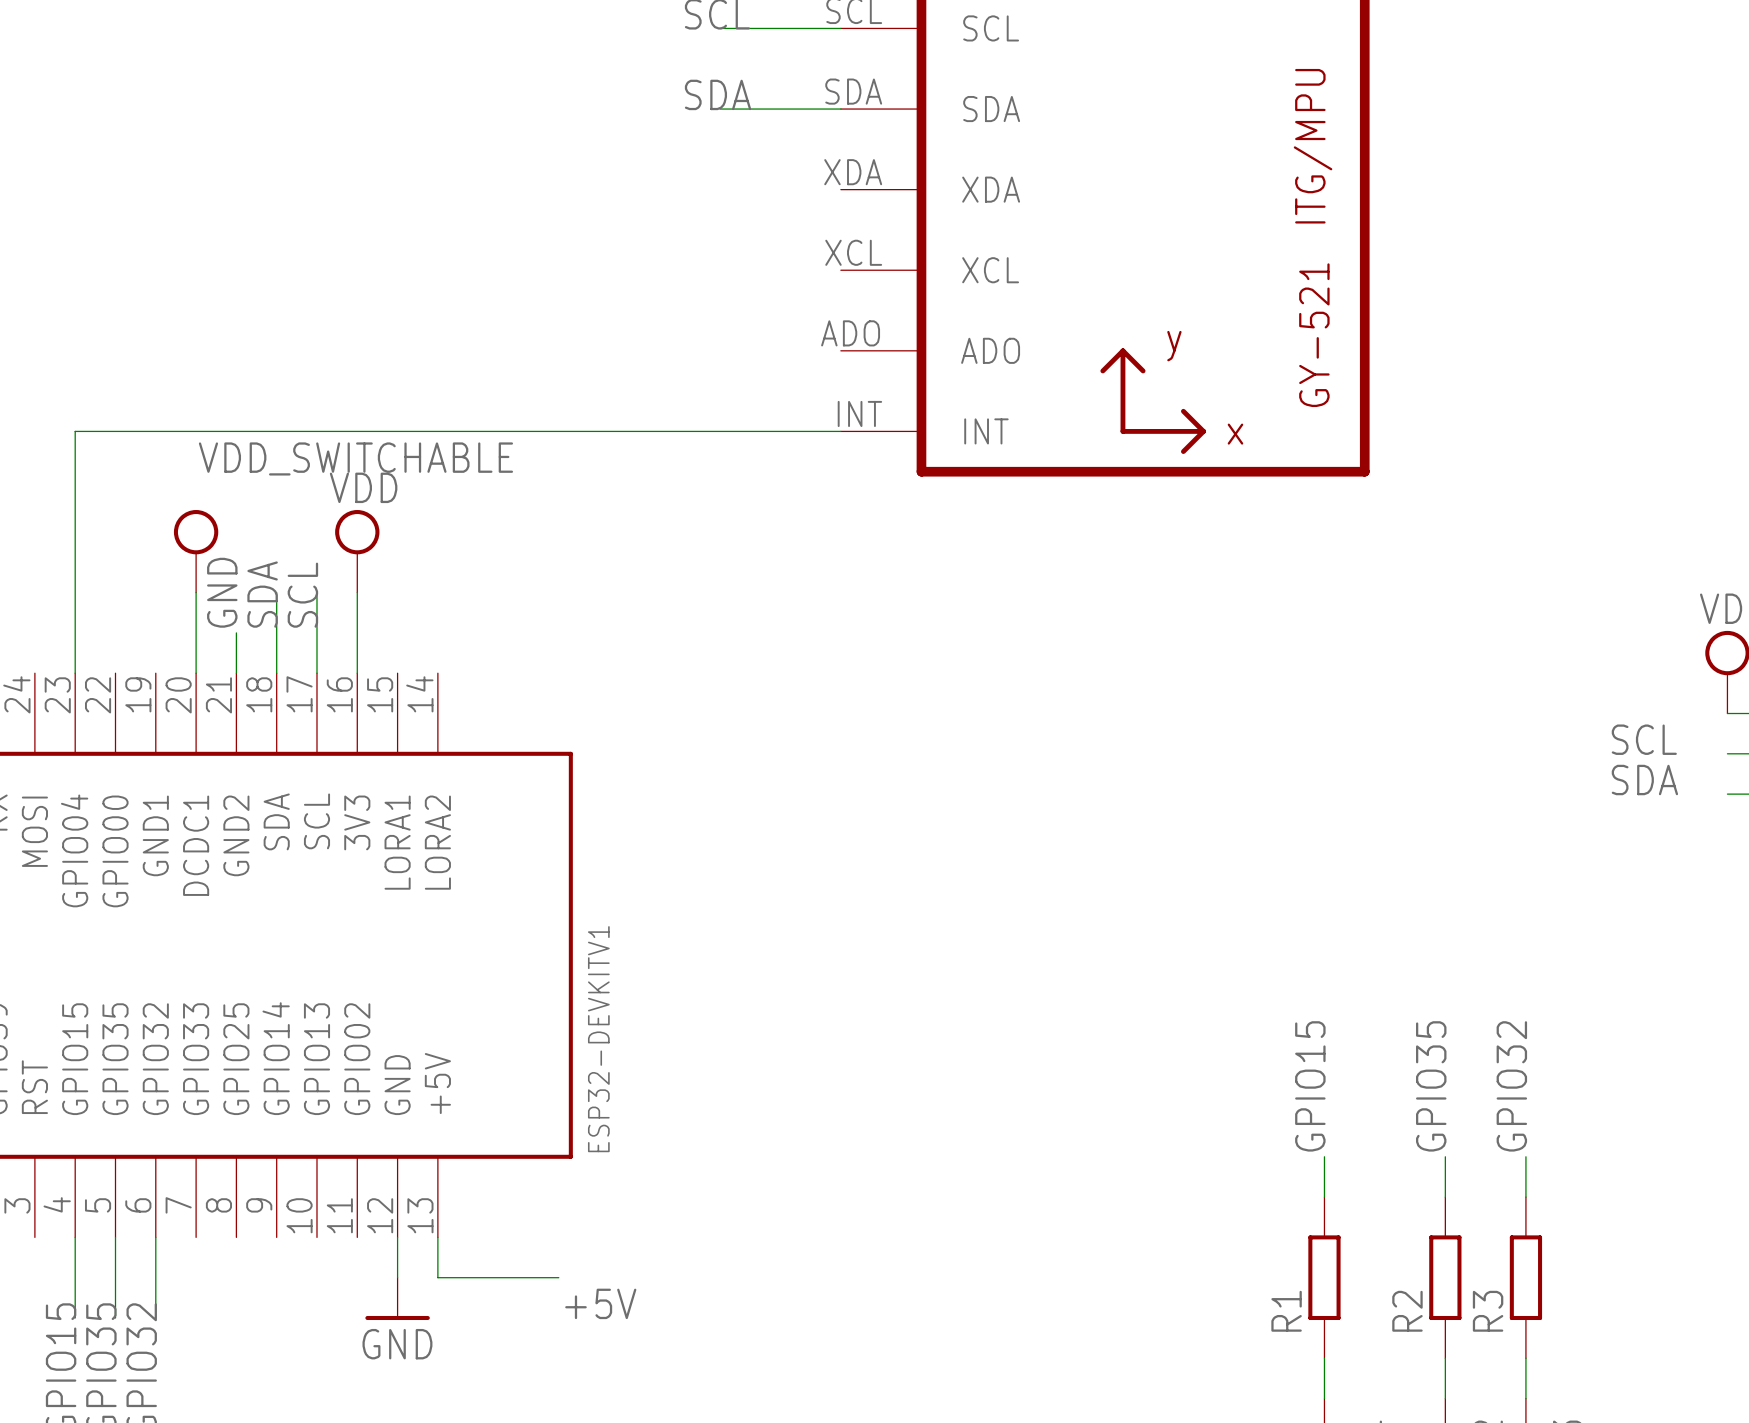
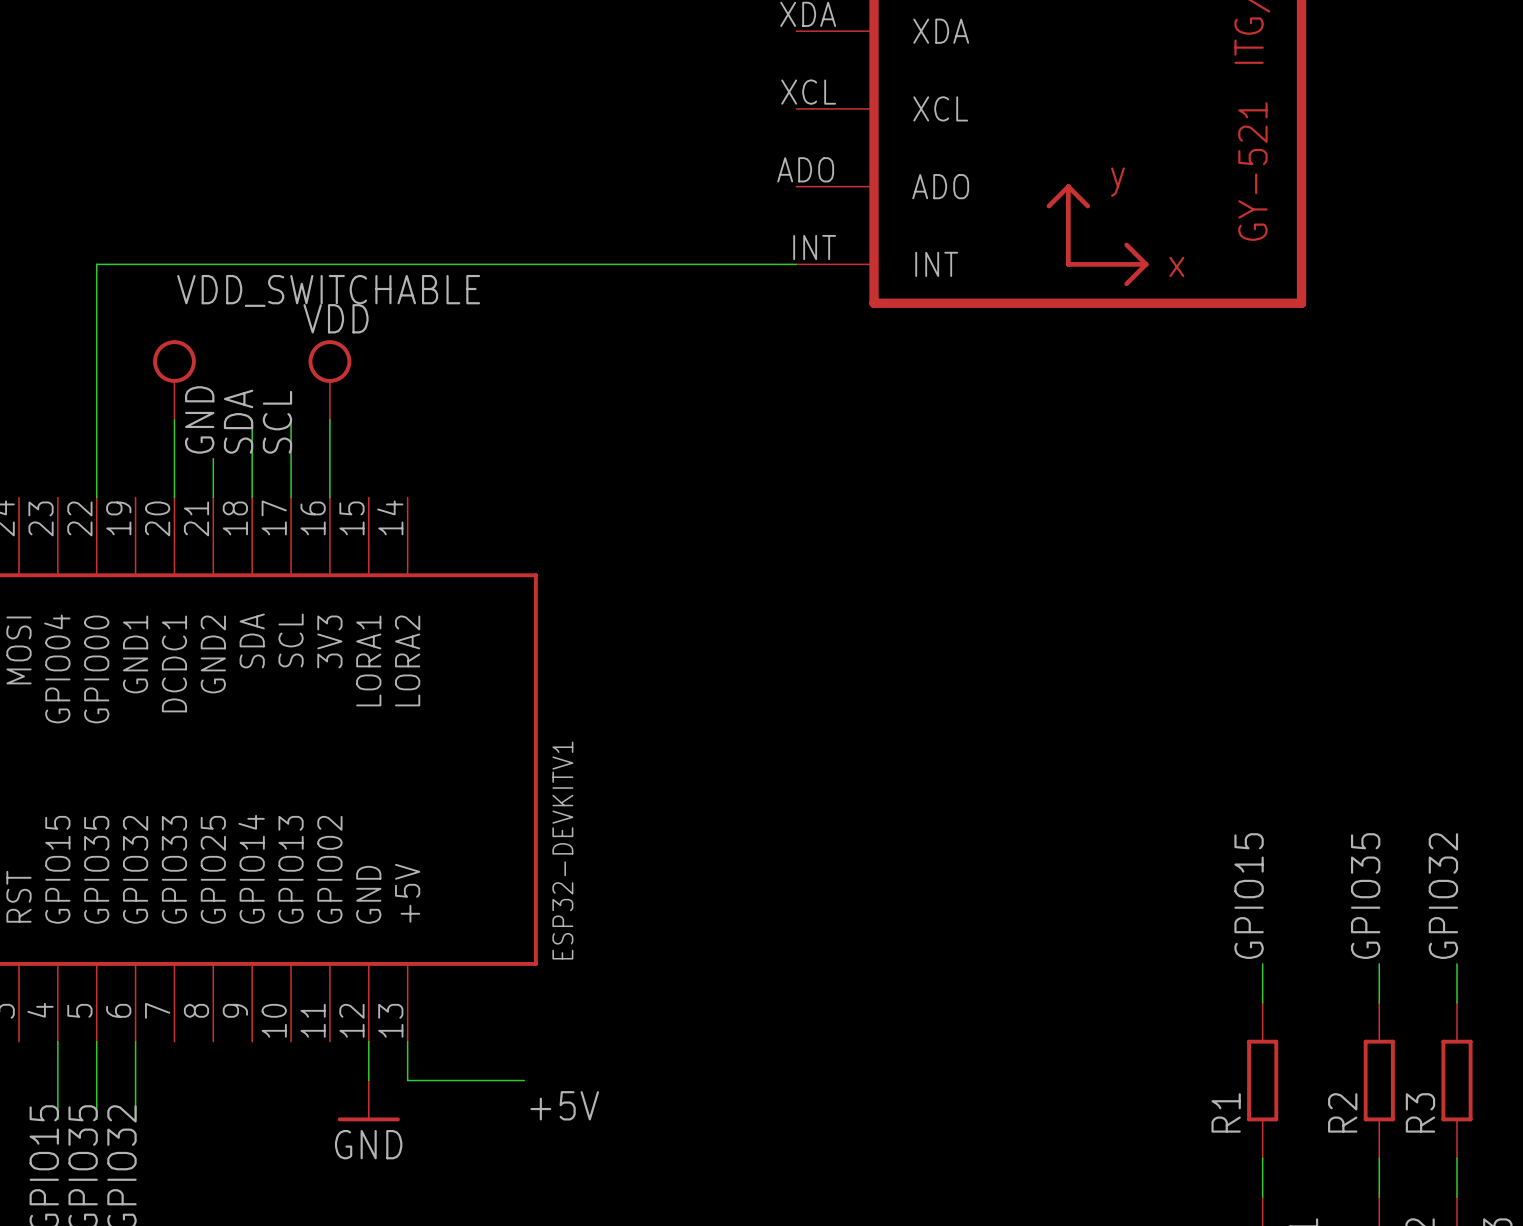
wire: (115, 431) (75, 431) (75, 673) -> (96, 264) (96, 497)

